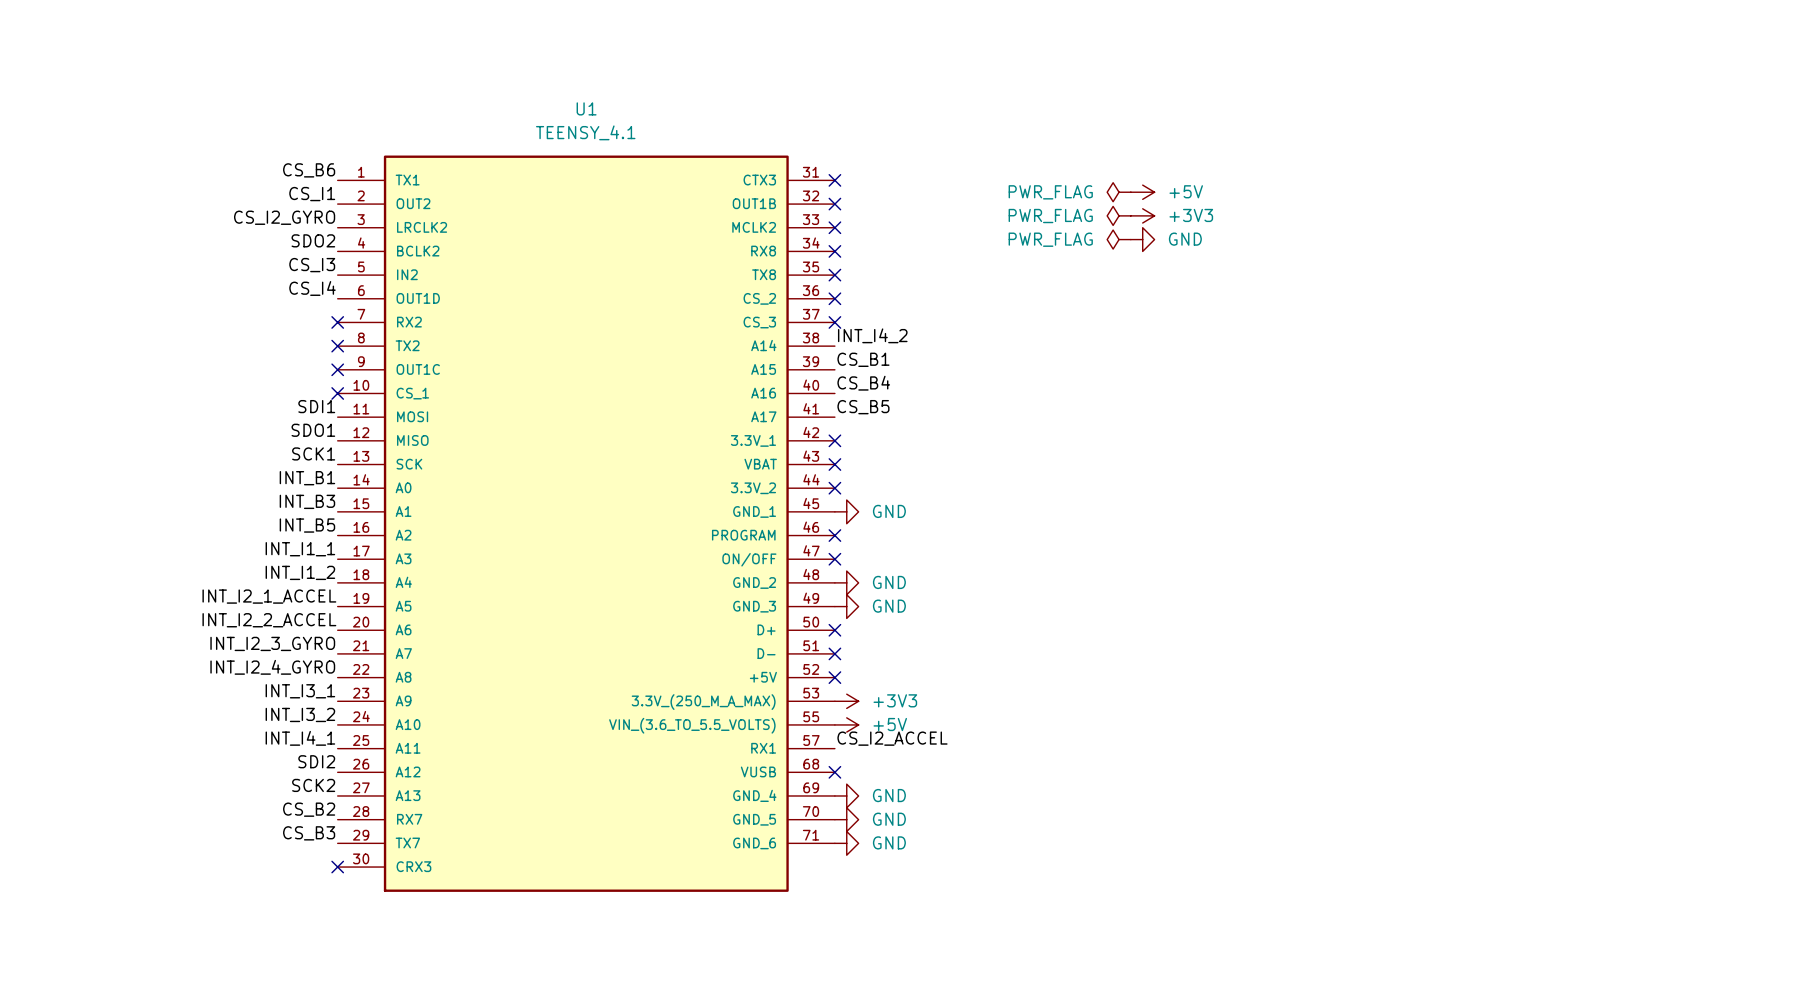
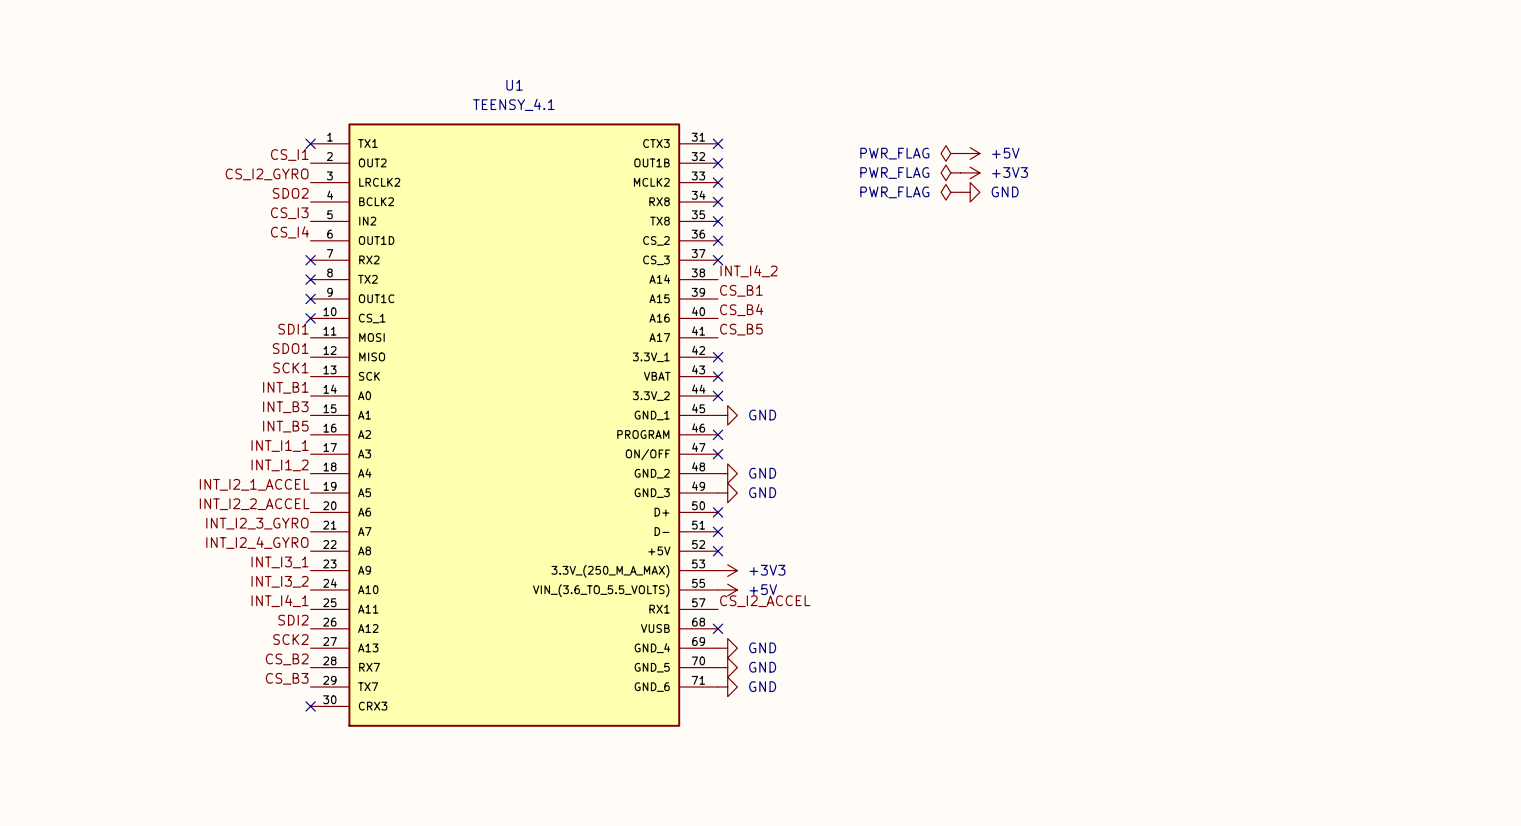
label: CS_B6 (309, 170) -> none
no-connect mark: none -> (310, 143)

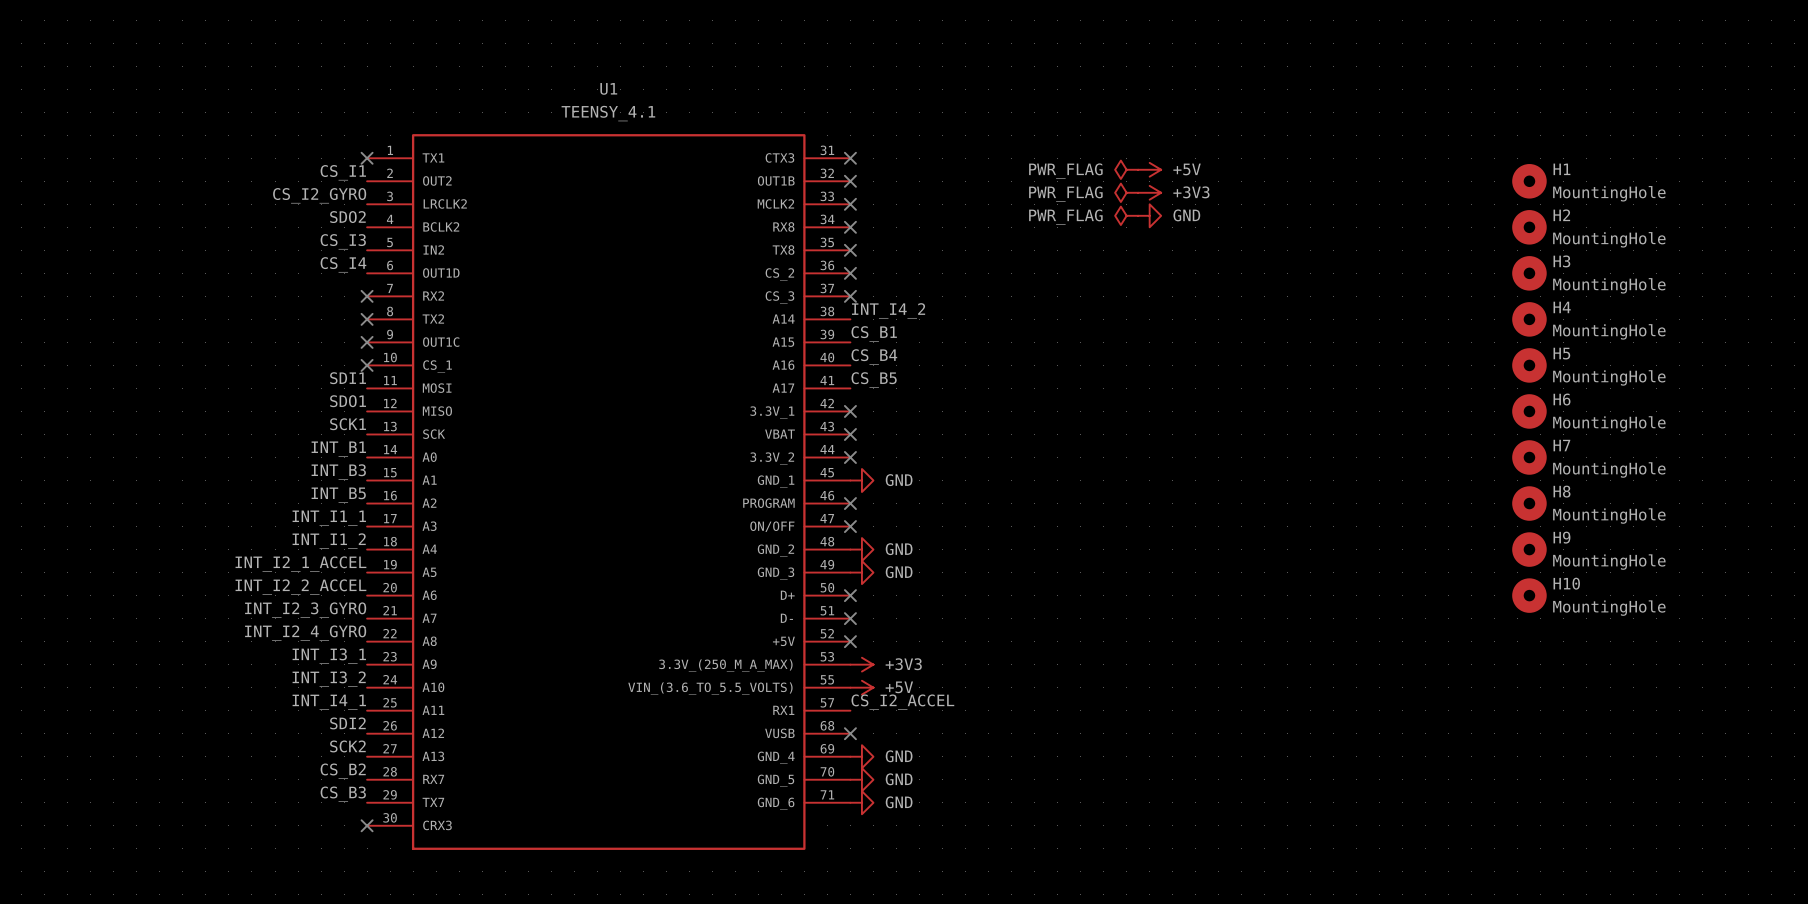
H1: none -> MountingHole (1529, 181)
H2: none -> MountingHole (1529, 227)
H3: none -> MountingHole (1529, 273)
H4: none -> MountingHole (1529, 319)
H5: none -> MountingHole (1529, 365)
H6: none -> MountingHole (1529, 411)
H7: none -> MountingHole (1529, 457)
H8: none -> MountingHole (1529, 503)
H9: none -> MountingHole (1529, 549)
H10: none -> MountingHole (1529, 595)

